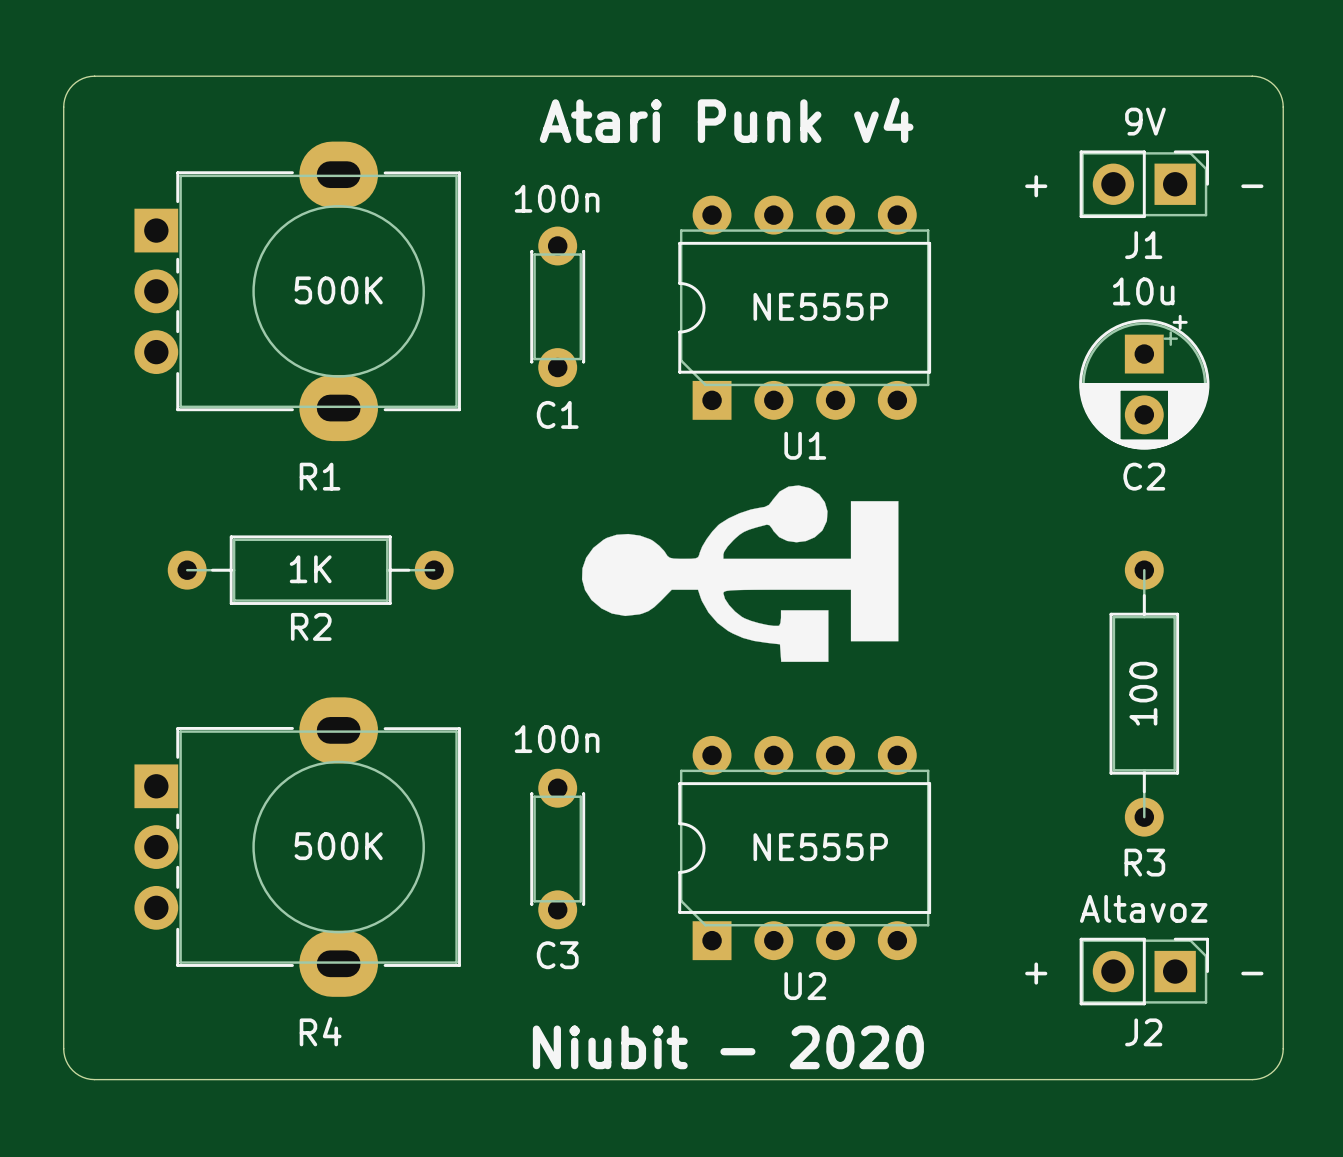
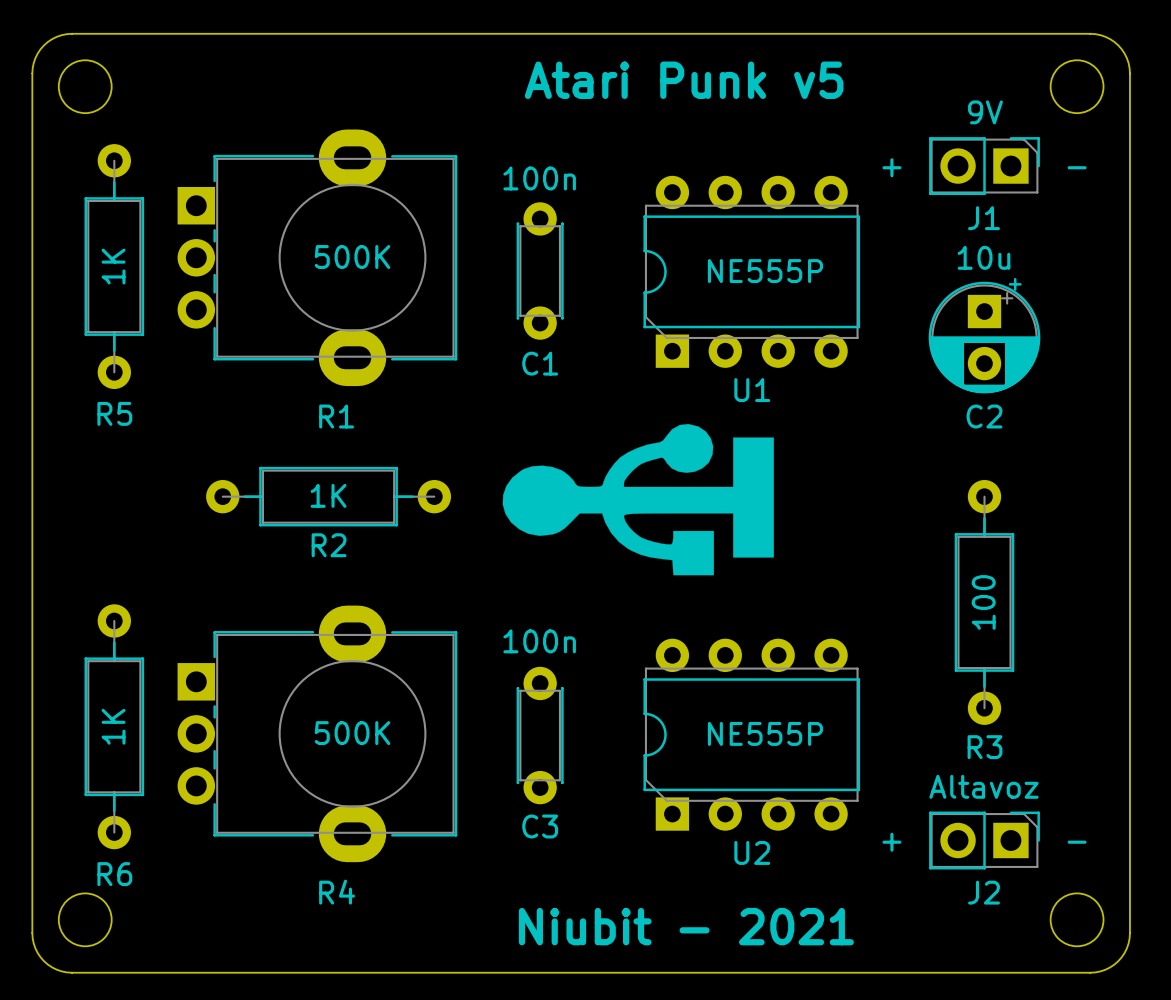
round board edge: none -> [58, 59, 113, 114]
round board edge: none -> [1050, 59, 1105, 114]
board edge: (63, 107) (66, 95) (72, 85) (82, 78) (94, 76) (1252, 76) (1260, 77) (1271, 82) (1280, 95) (1283, 107) (1283, 1048) (1280, 1060) (1276, 1067) (1264, 1077) (1252, 1079) (94, 1079) (86, 1078) (75, 1073) (67, 1064) (63, 1048) (63, 107) -> (72, 33) (56, 36) (43, 45) (35, 58) (32, 73) (32, 933) (35, 948) (43, 961) (56, 969) (72, 972) (1090, 972) (1105, 969) (1118, 961) (1126, 948) (1129, 933) (1129, 73) (1126, 58) (1118, 45) (1105, 36) (1090, 33) (72, 33)
text: Atari Punk v4 (726, 120) -> Atari Punk v5 (684, 80)
R1 position: (297, 291) -> (317, 257)
R5: none -> 1K (114, 266)
C1 position: (557, 306) -> (540, 271)
U1 position: (804, 307) -> (751, 271)
R2 position: (310, 570) -> (328, 496)
R6: none -> 1K (114, 726)
R4 position: (297, 847) -> (317, 733)
U2 position: (804, 848) -> (751, 734)
C3 position: (557, 849) -> (540, 735)
round board edge: none -> [58, 892, 113, 947]
round board edge: none -> [1050, 892, 1105, 947]
text: Niubit - 2020 (728, 1047) -> Niubit - 2021 (686, 926)

